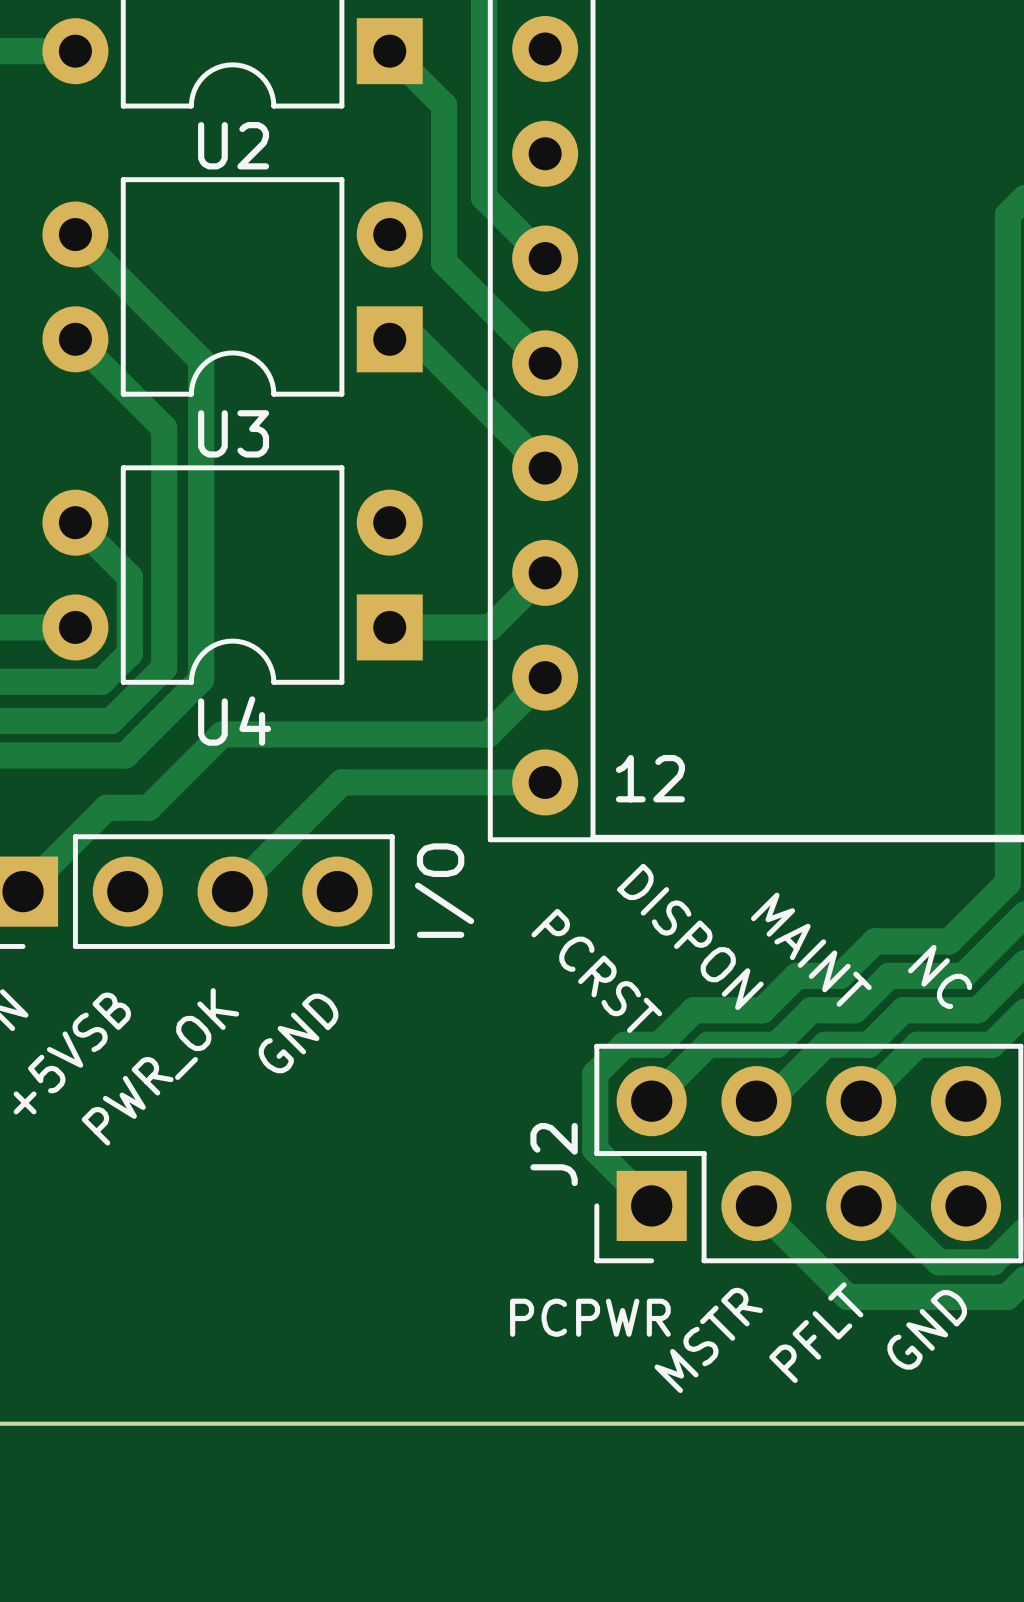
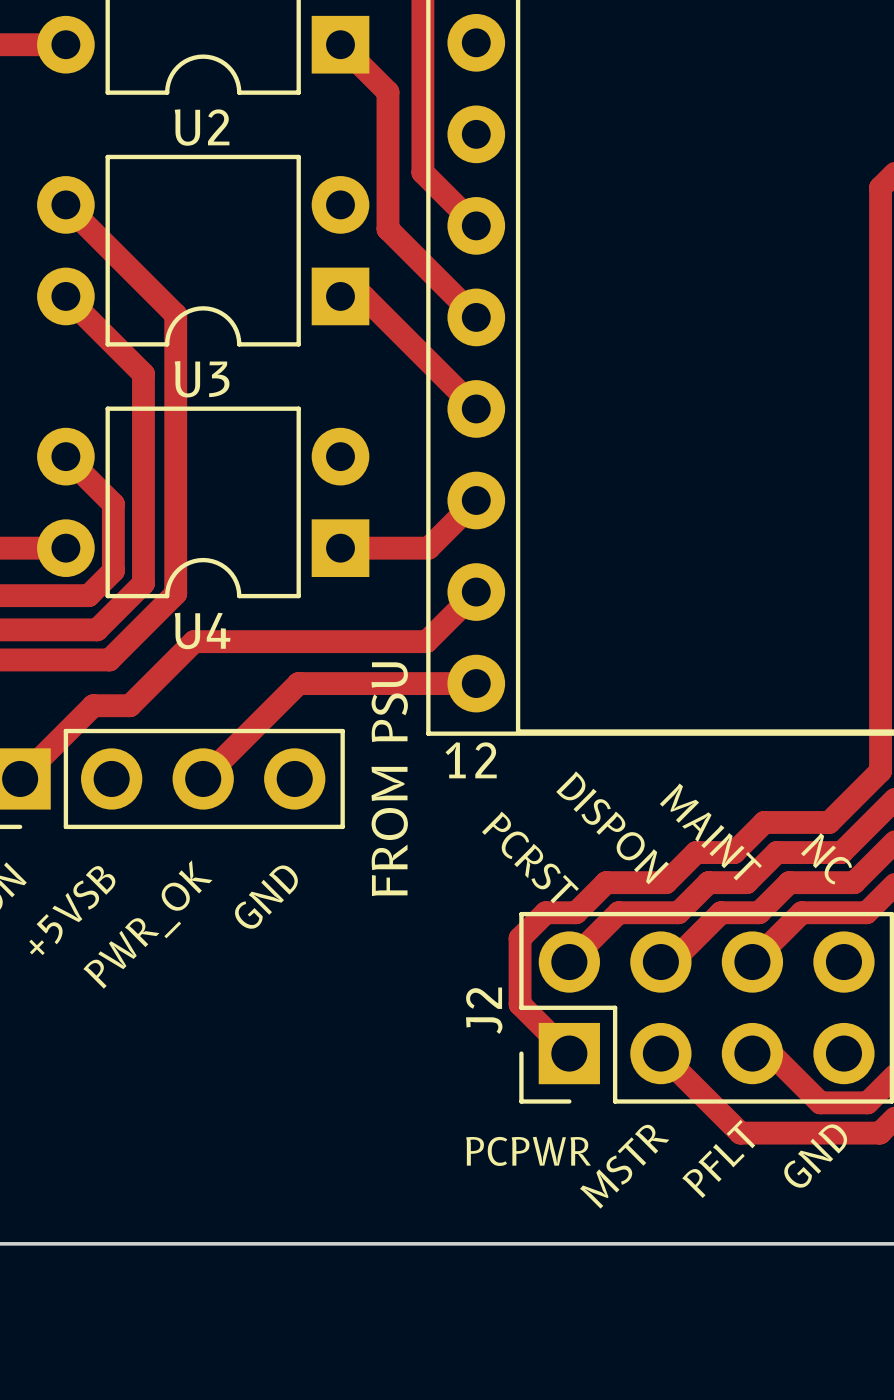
text position: 12 (650, 778) -> 12 (471, 760)
part text: I/O (444, 890) -> none
part value: none -> FROM PSU (389, 779)

